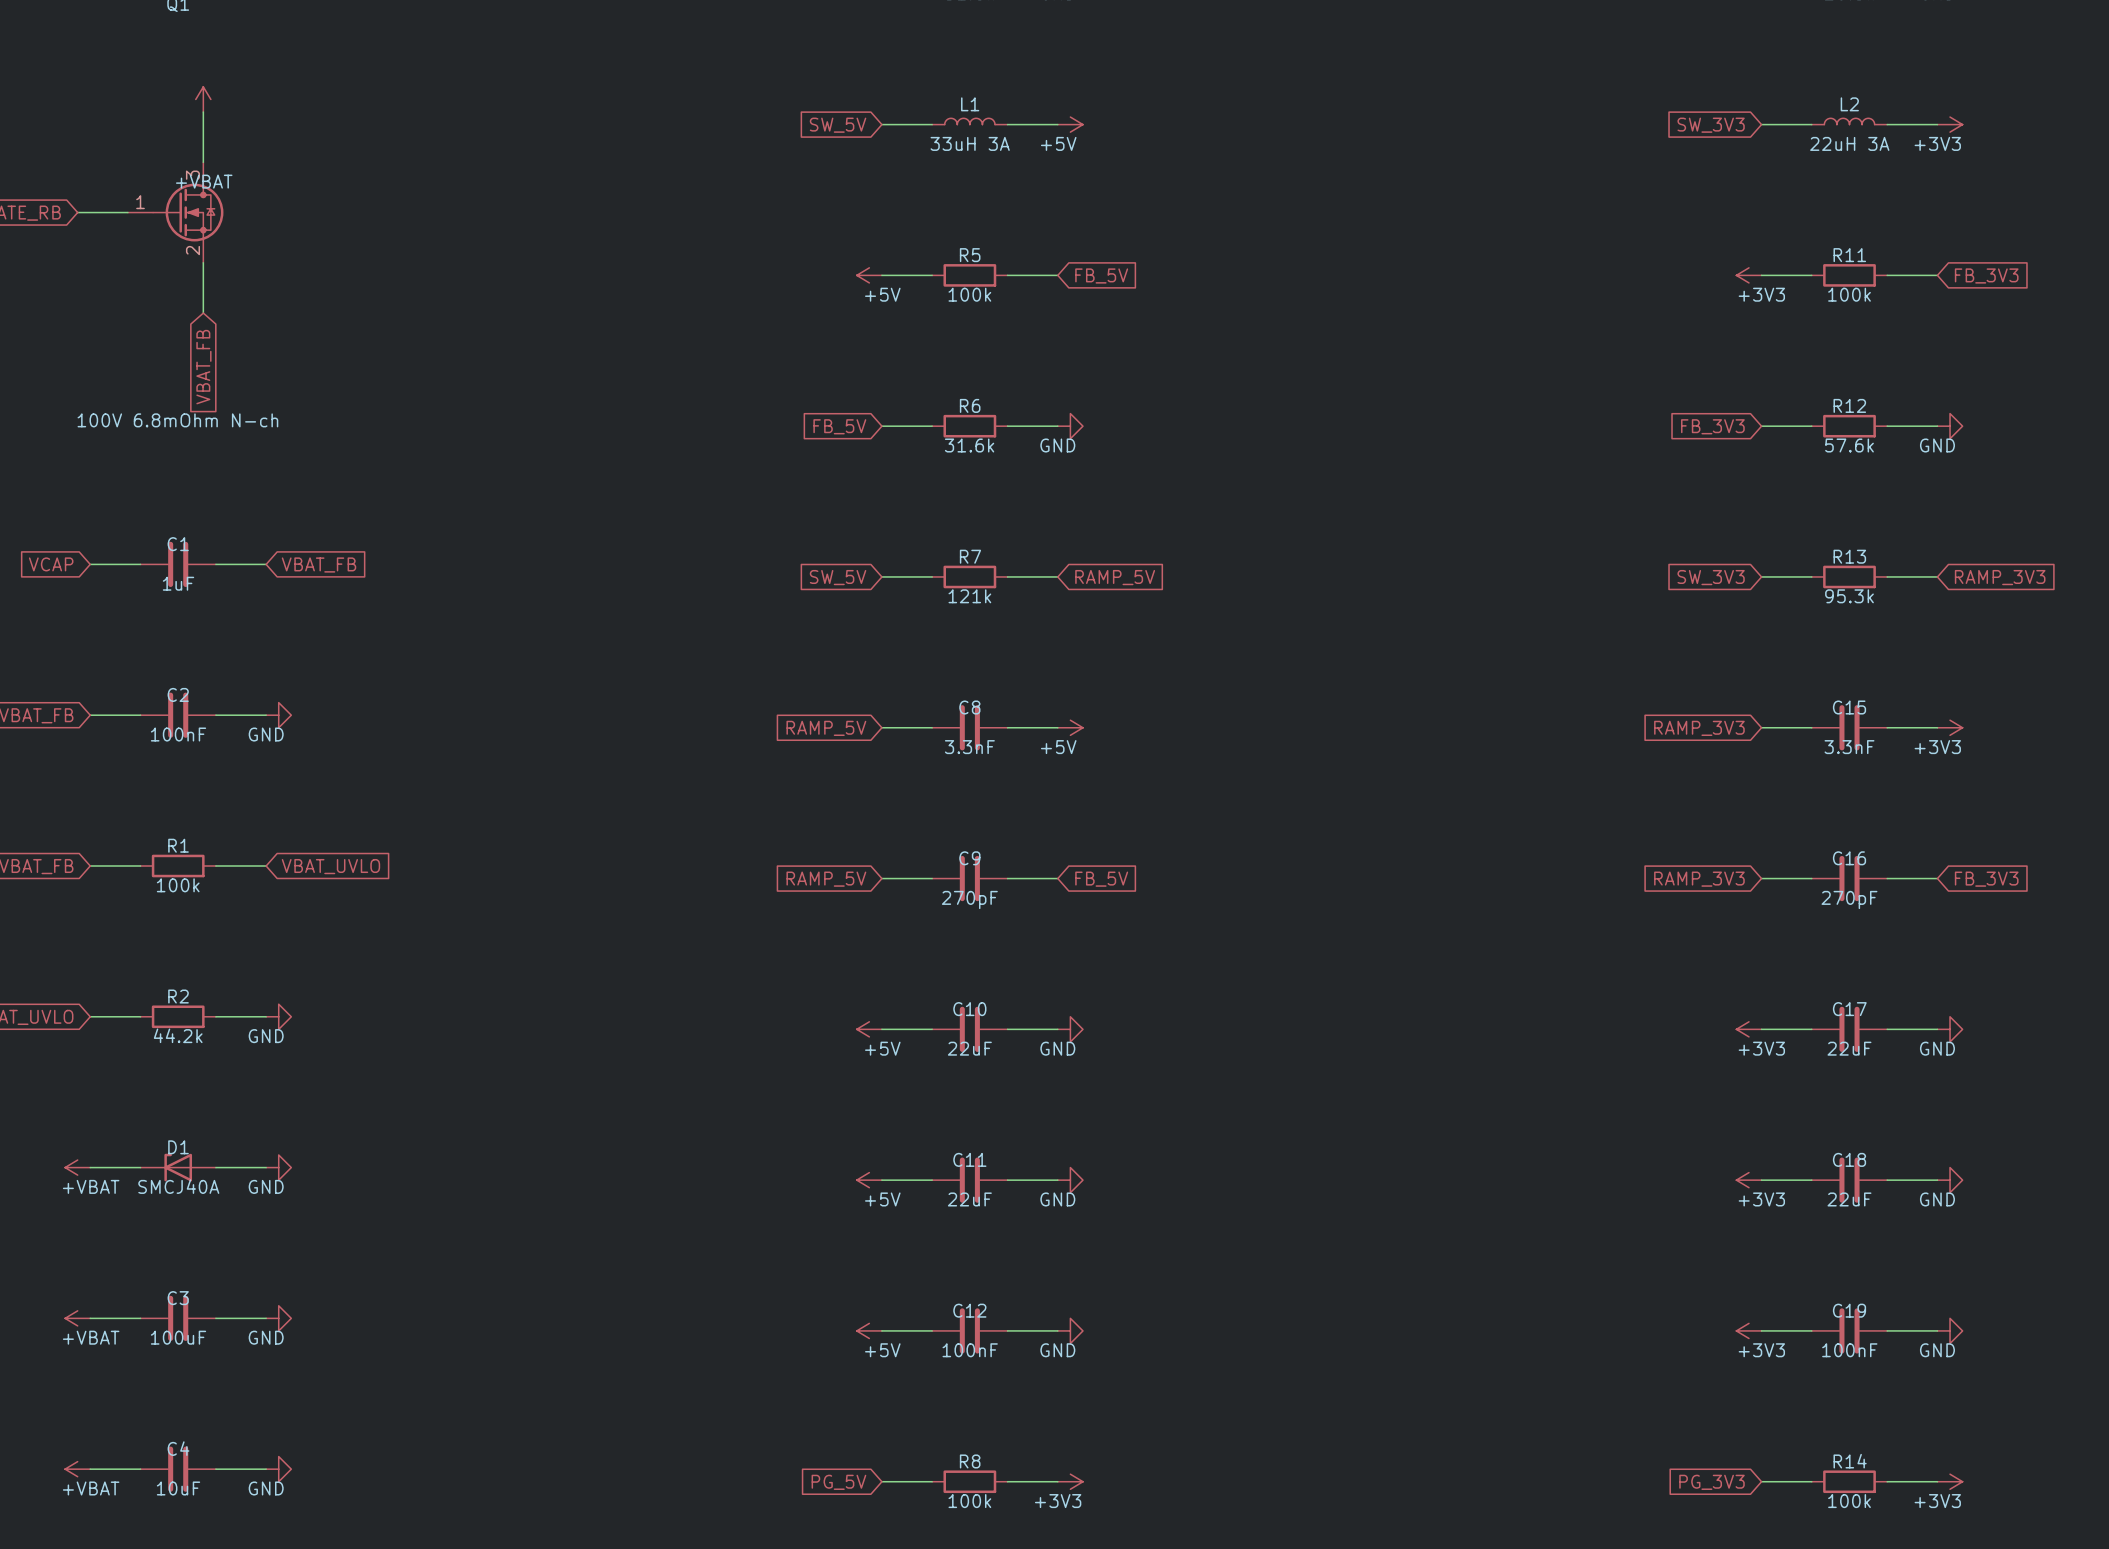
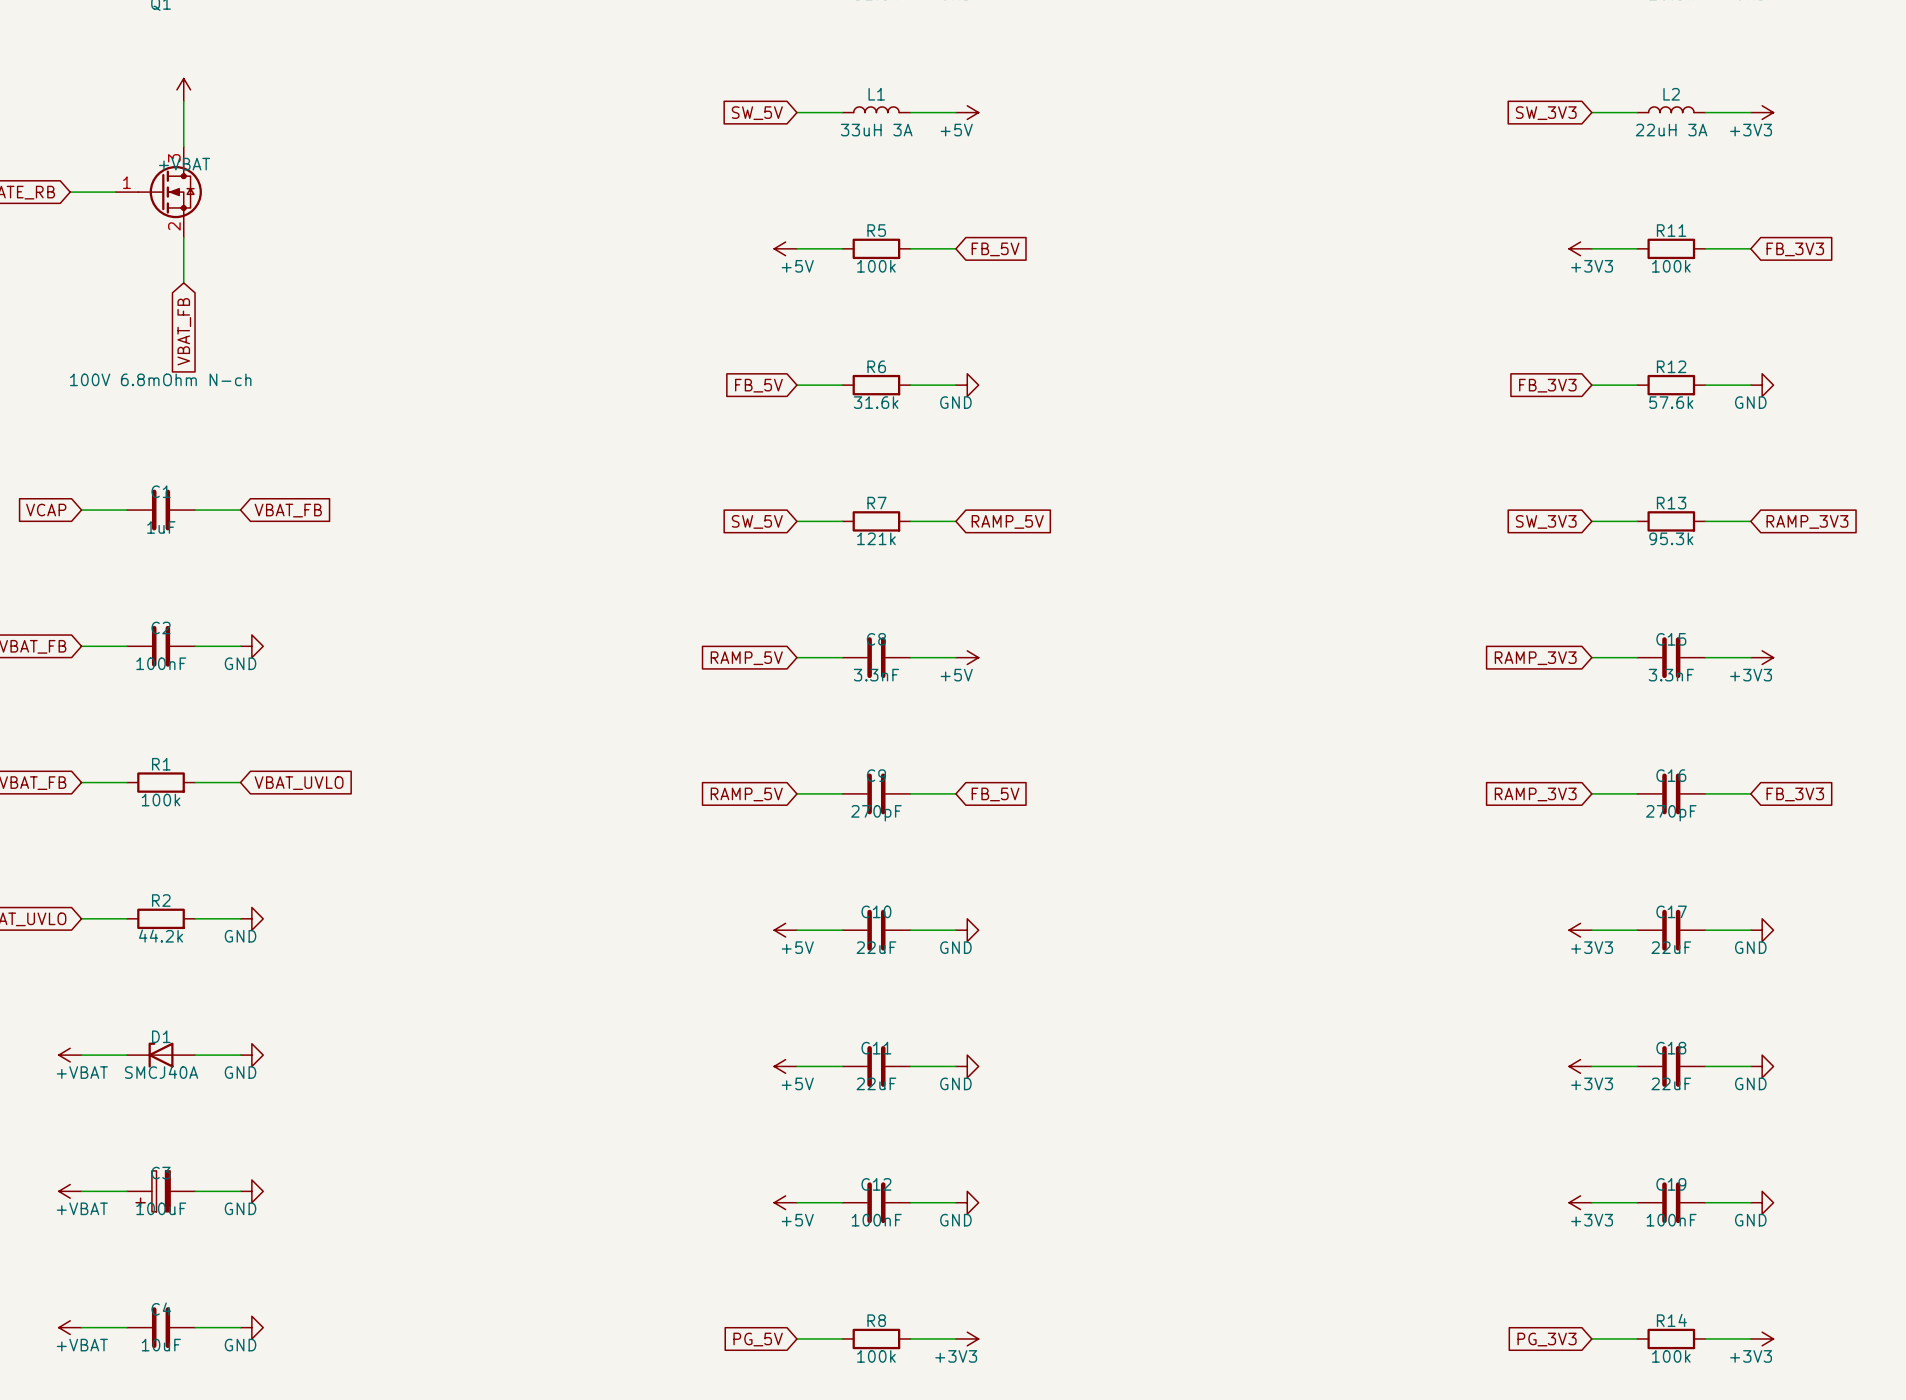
C3 symbol: [140, 1295, 216, 1341] -> [126, 1170, 196, 1212]

